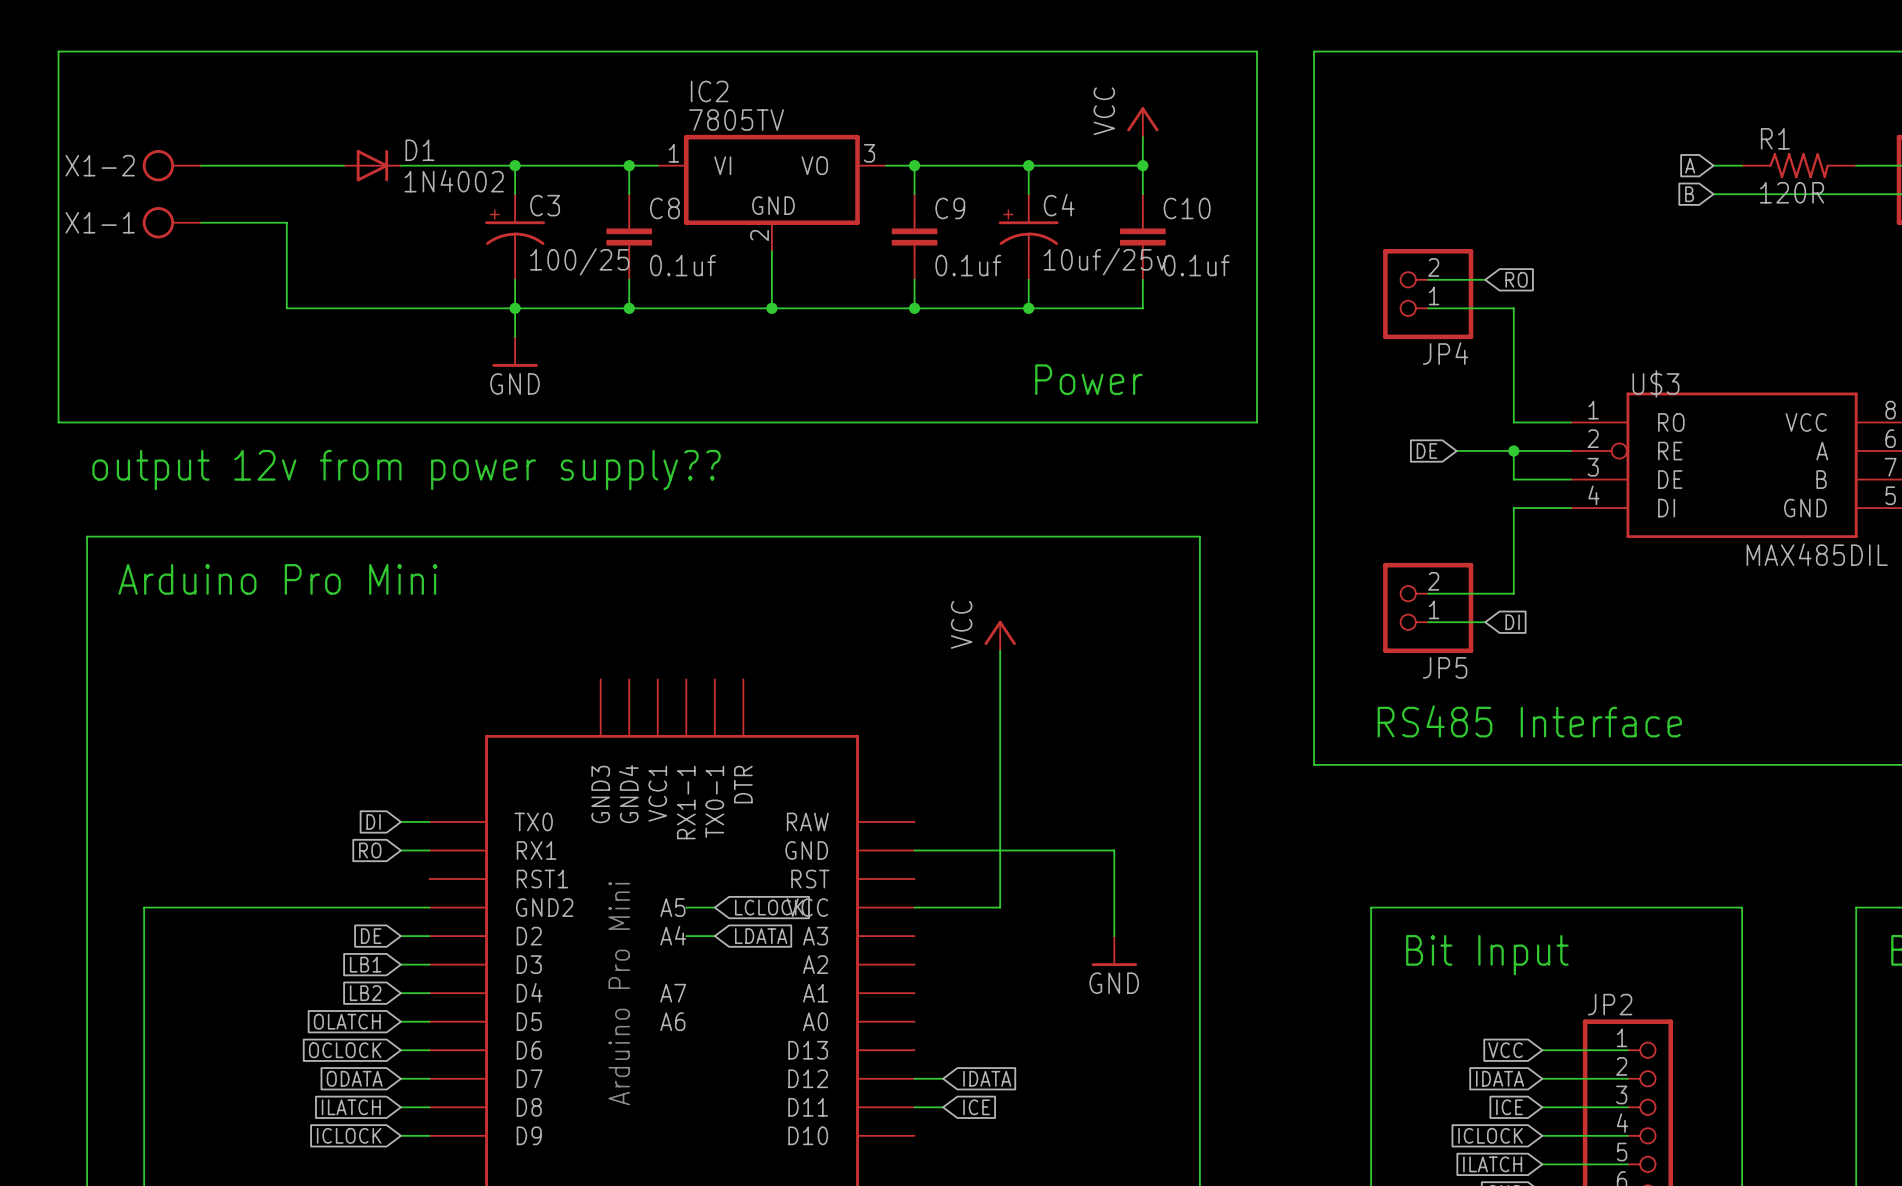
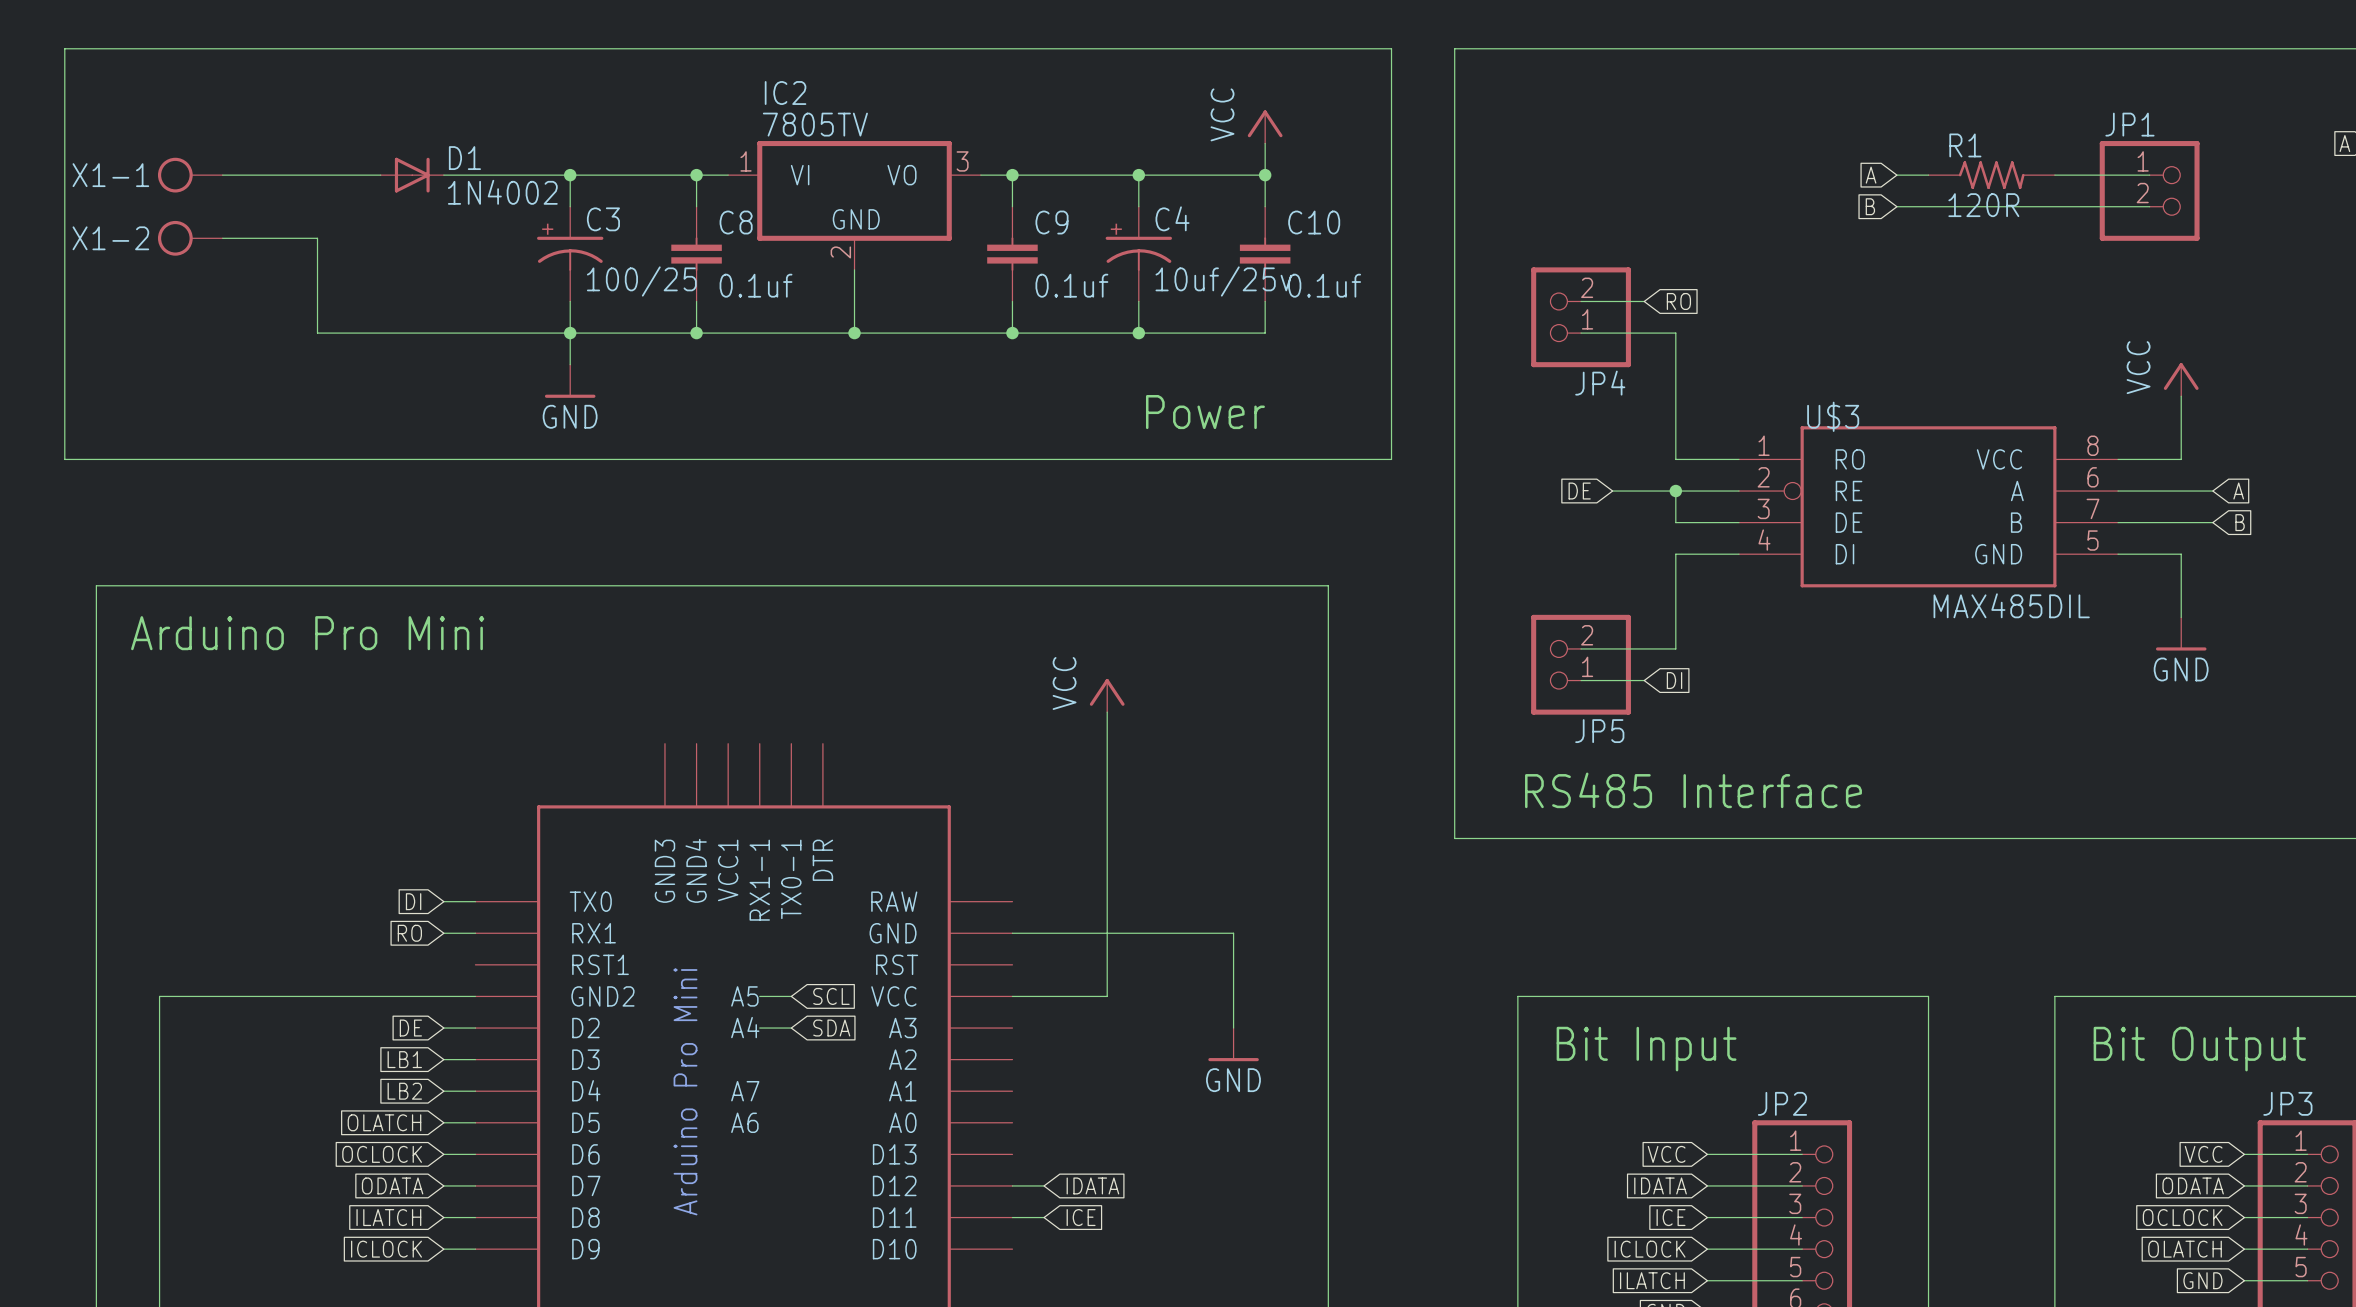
X1-2 name: X1-2 (100, 165) -> X1-1 (110, 175)
X1-1 name: X1-1 (100, 222) -> X1-2 (110, 238)
text: output 12v from power supply?? (406, 470) -> none
global label: LCLOCK (769, 907) -> SCL (831, 996)
global label: LDATA (761, 936) -> SDA (831, 1028)

